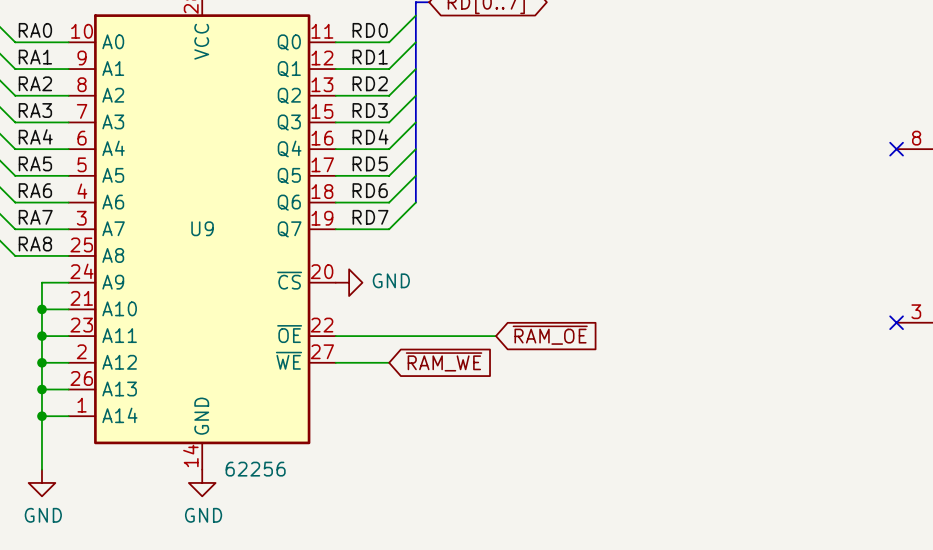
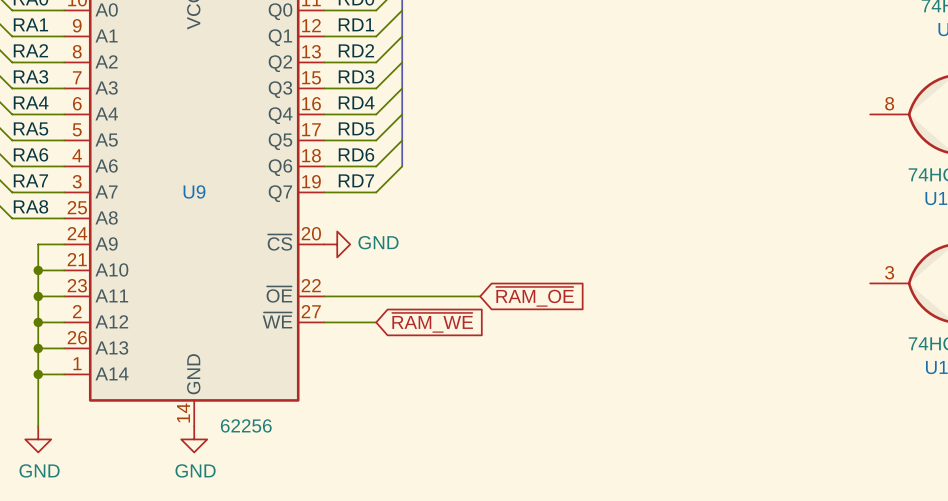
no-connect mark: (896, 149) -> none
no-connect mark: (896, 322) -> none

